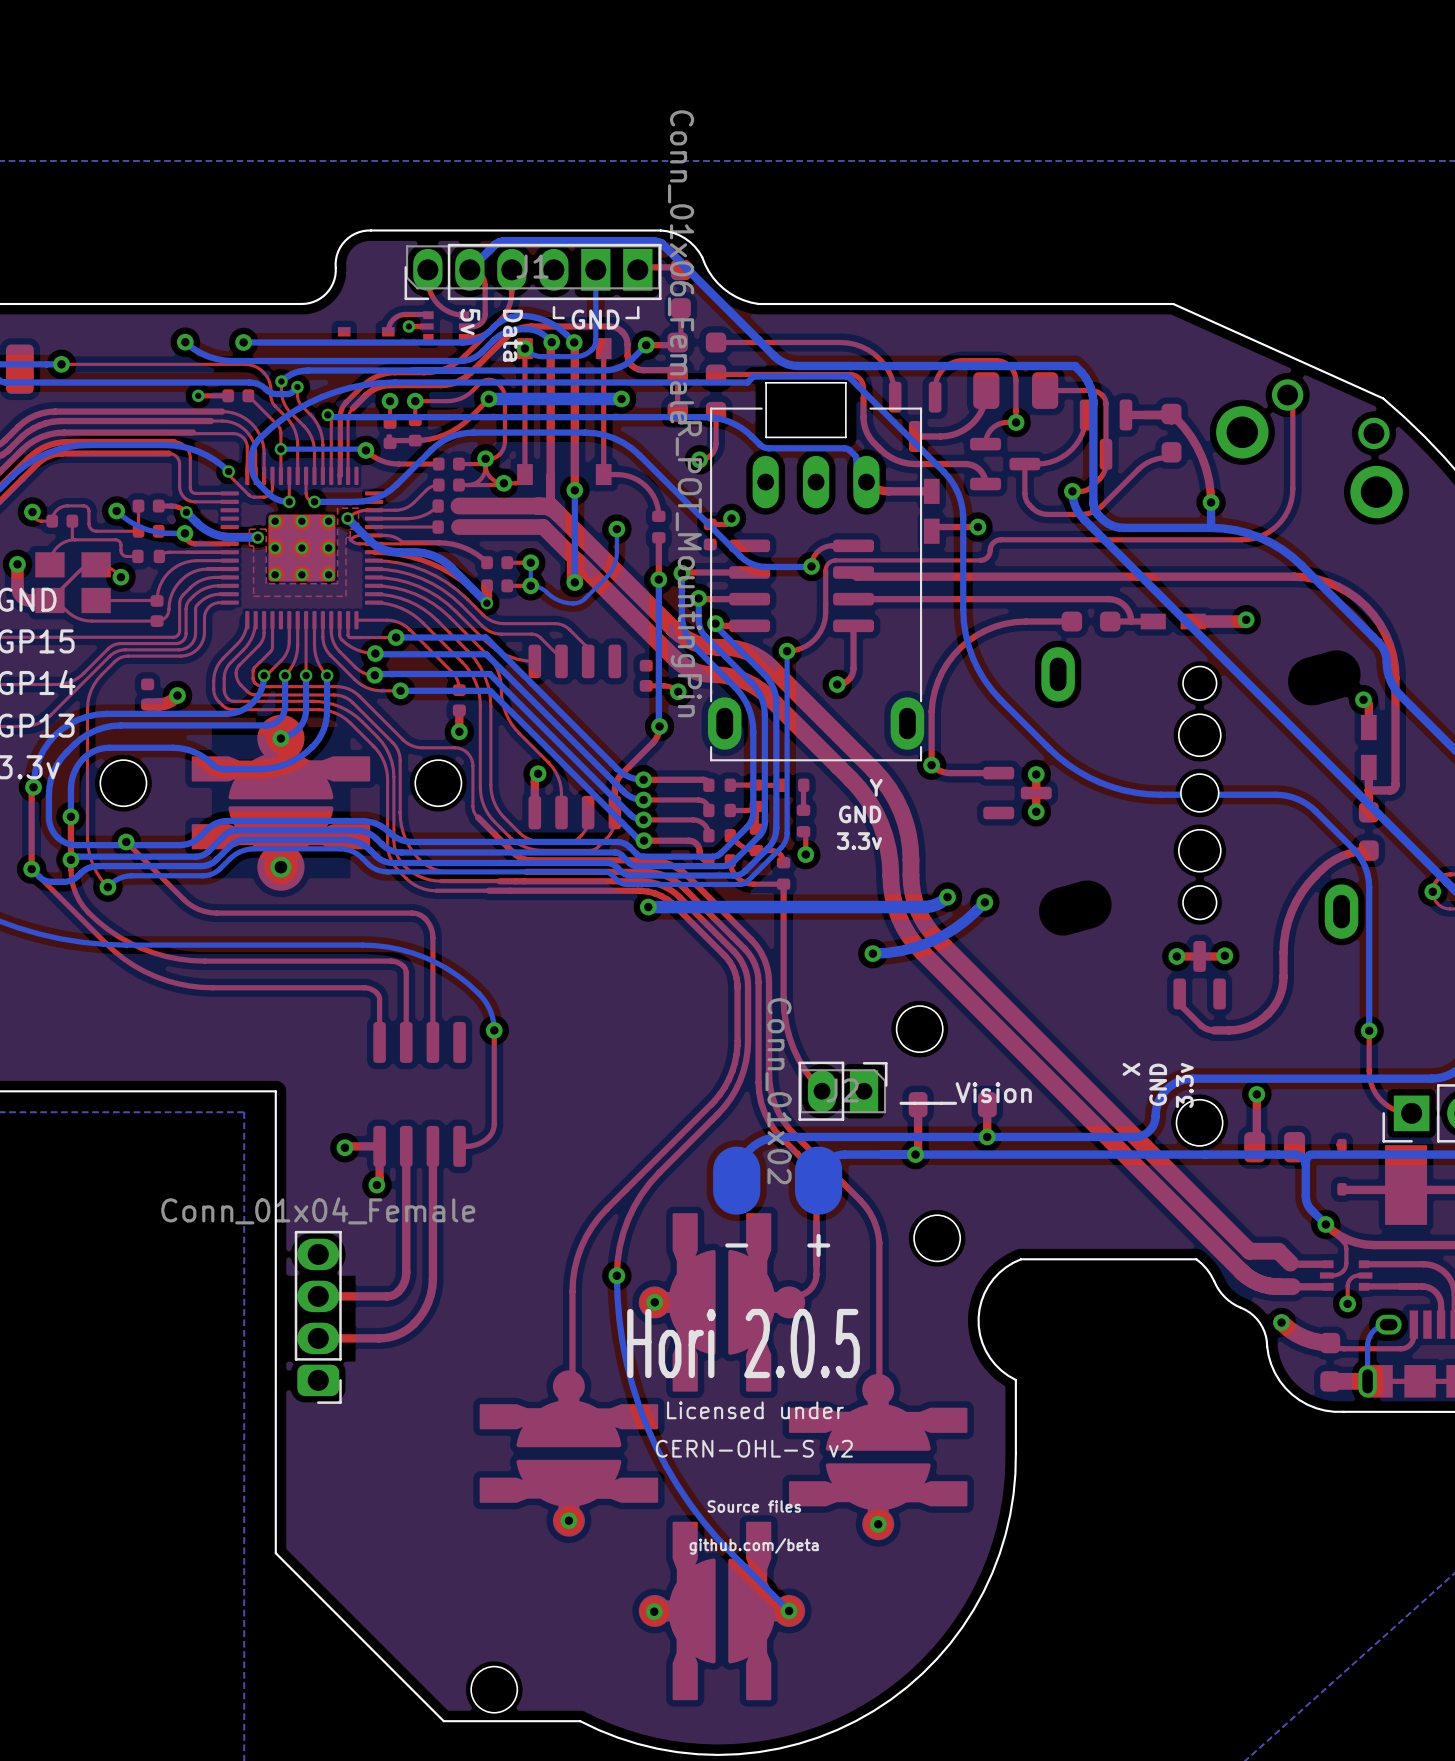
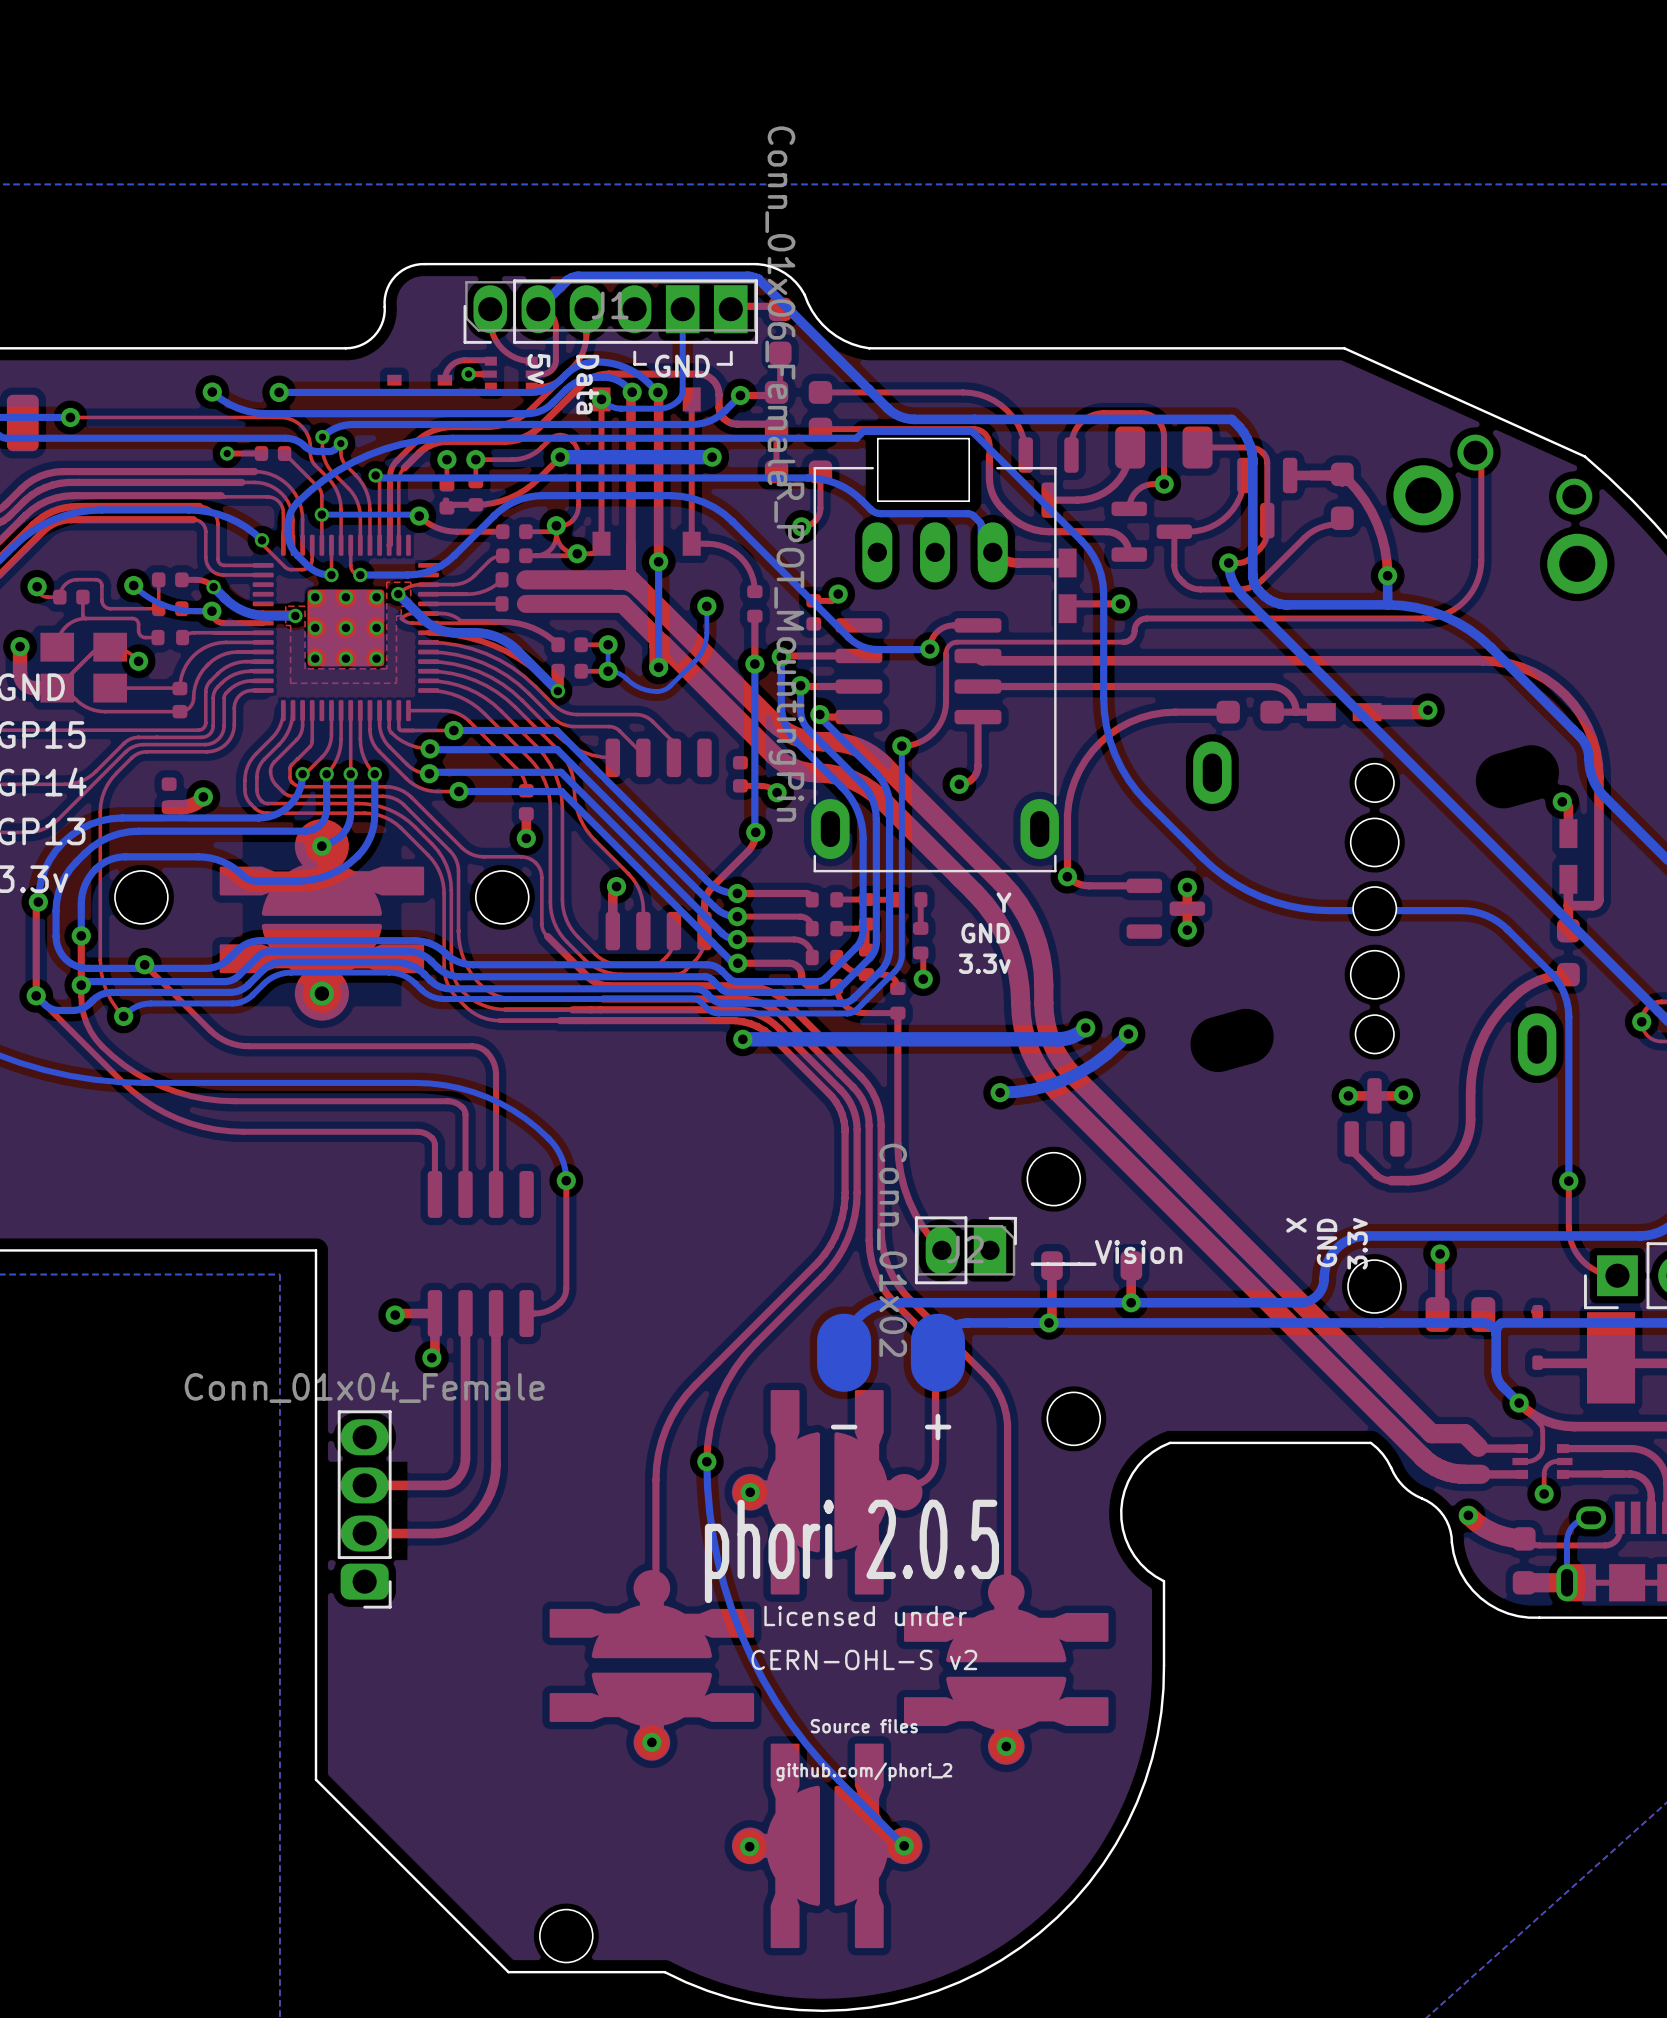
text: Hori 2.0.5 (743, 1343) -> phori 2.0.5 (851, 1551)
text: github.com/beta (754, 1546) -> github.com/phori_2 (864, 1771)

